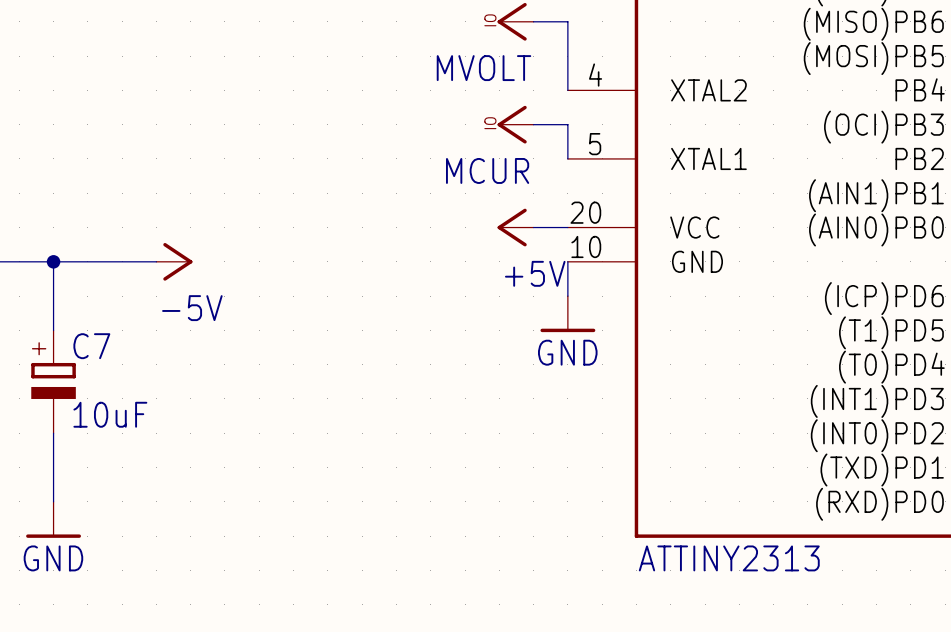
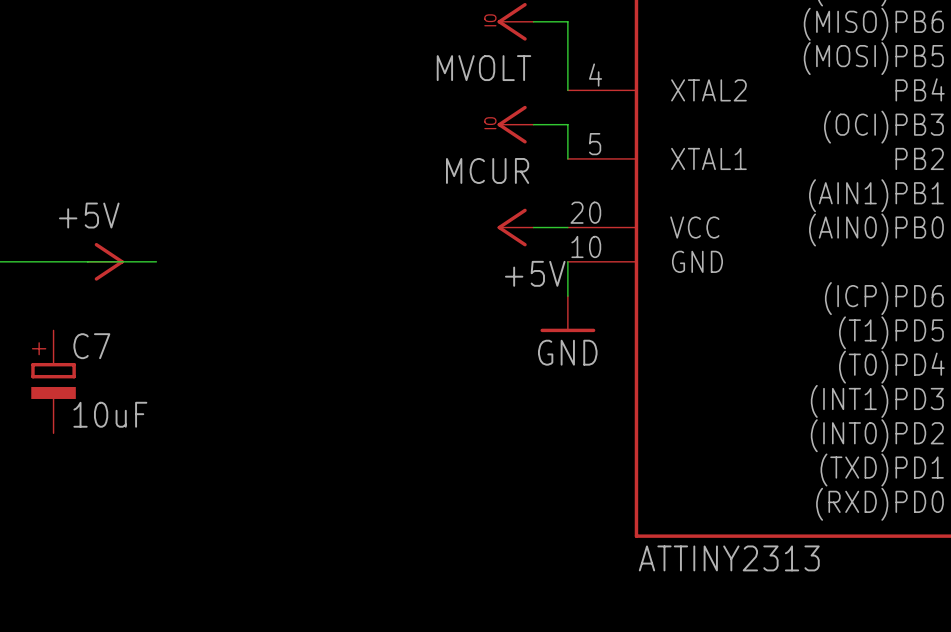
wire: (53, 261) (53, 330) -> none
junction: (53, 261) -> none
power symbol: none -> +5V (105, 261)
power symbol: -5V (174, 261) -> none
wire: (53, 433) (53, 501) -> none
power symbol: GND (53, 519) -> none

